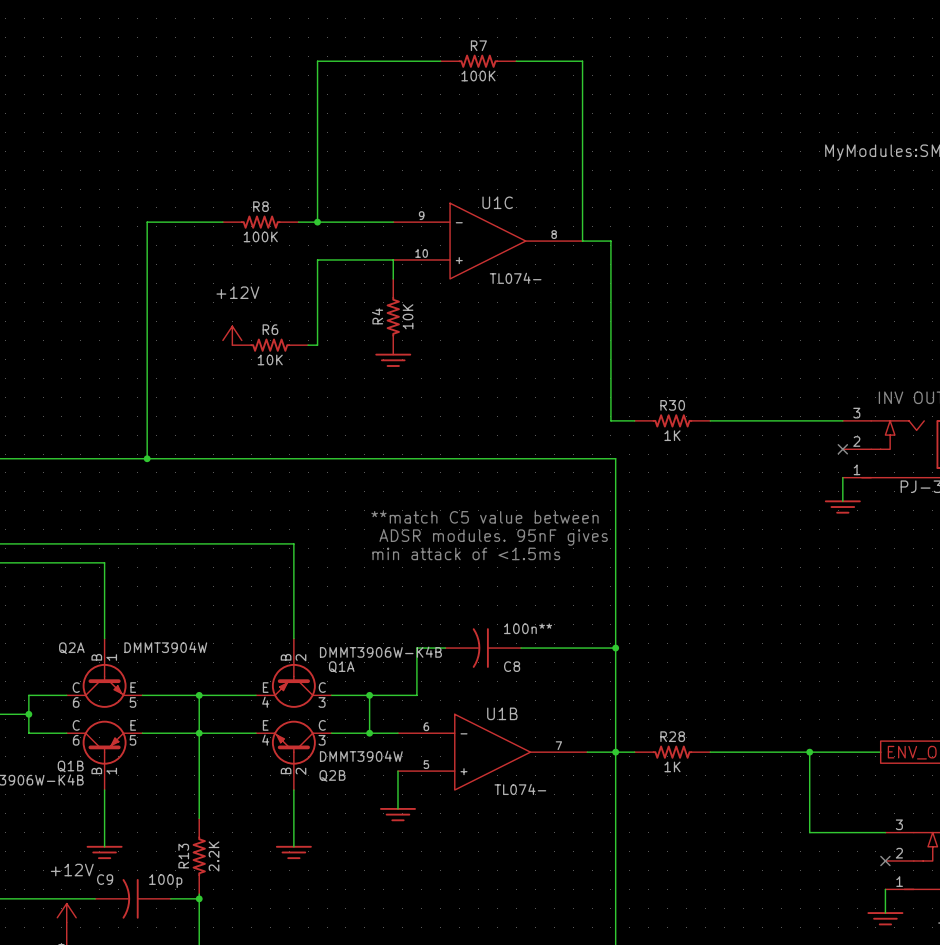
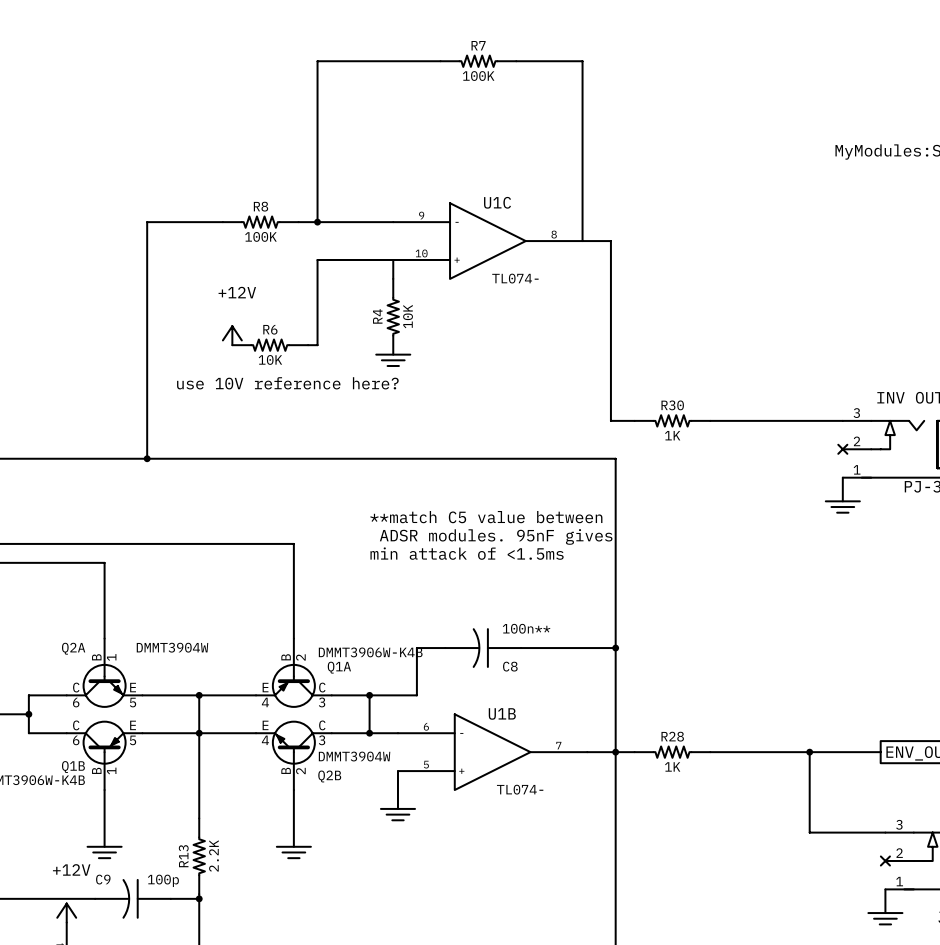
text: none -> use 10V reference here? (287, 383)

